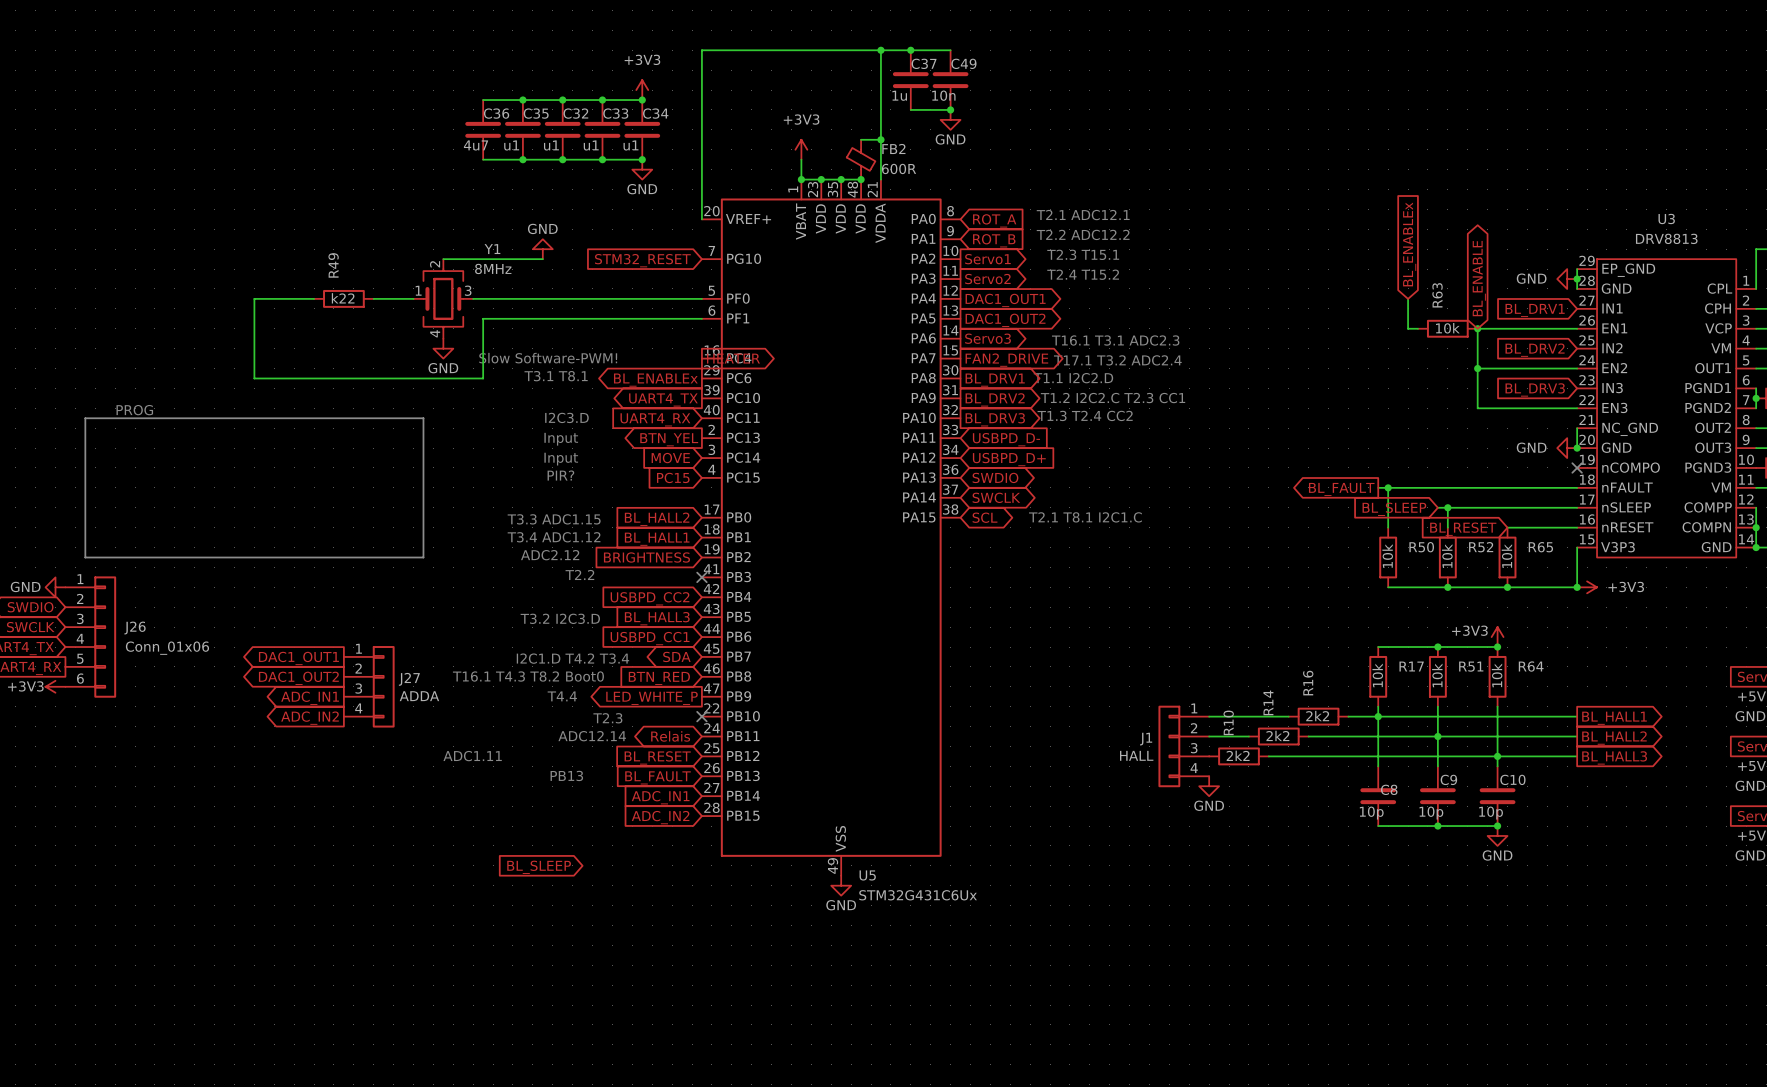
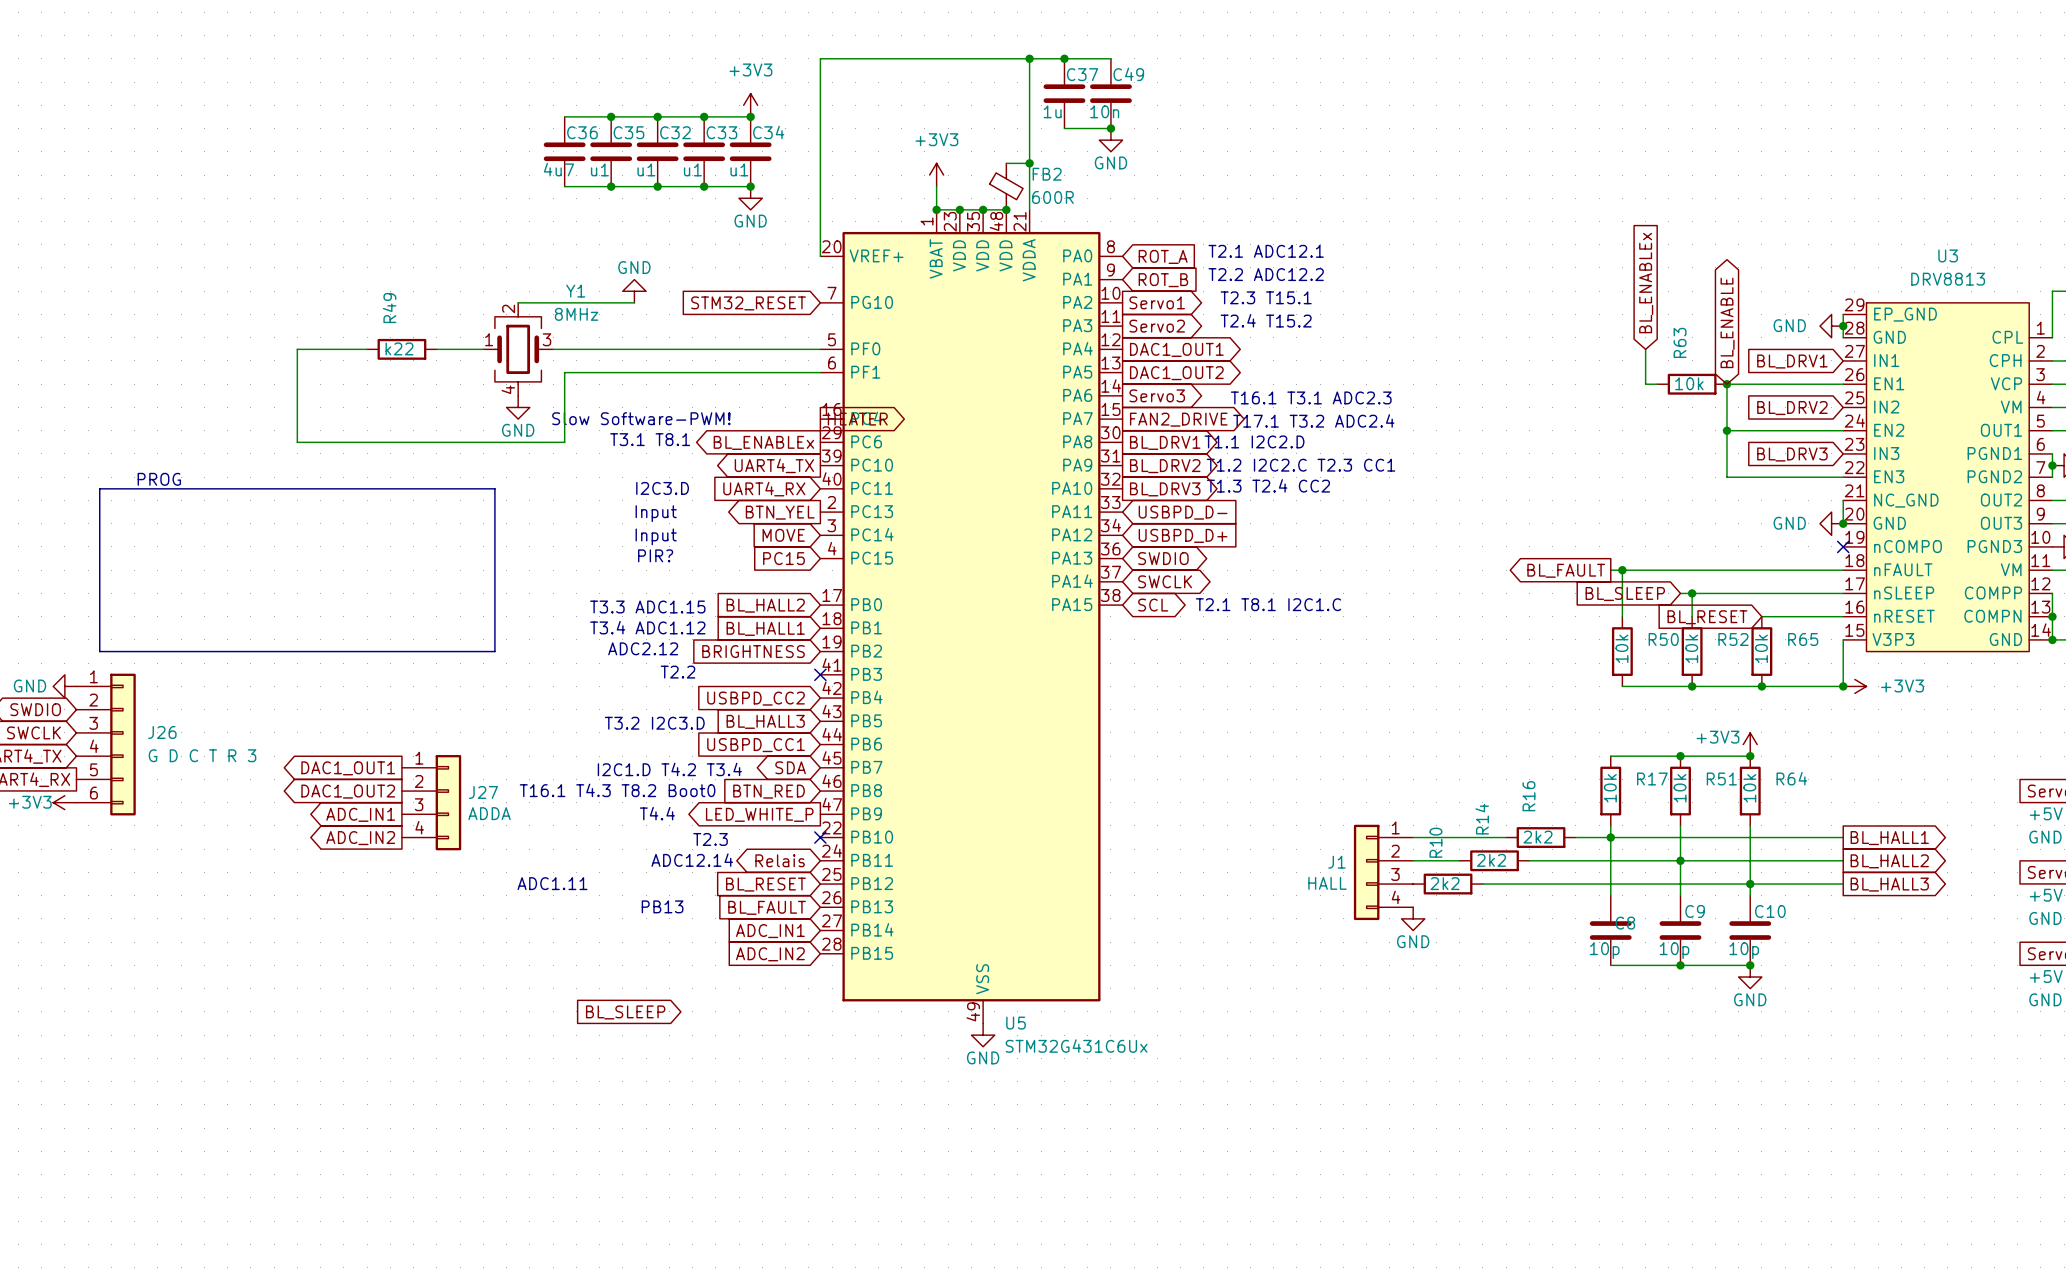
J26 value: Conn_01x06 (167, 648) -> G D C T R 3 (202, 755)

